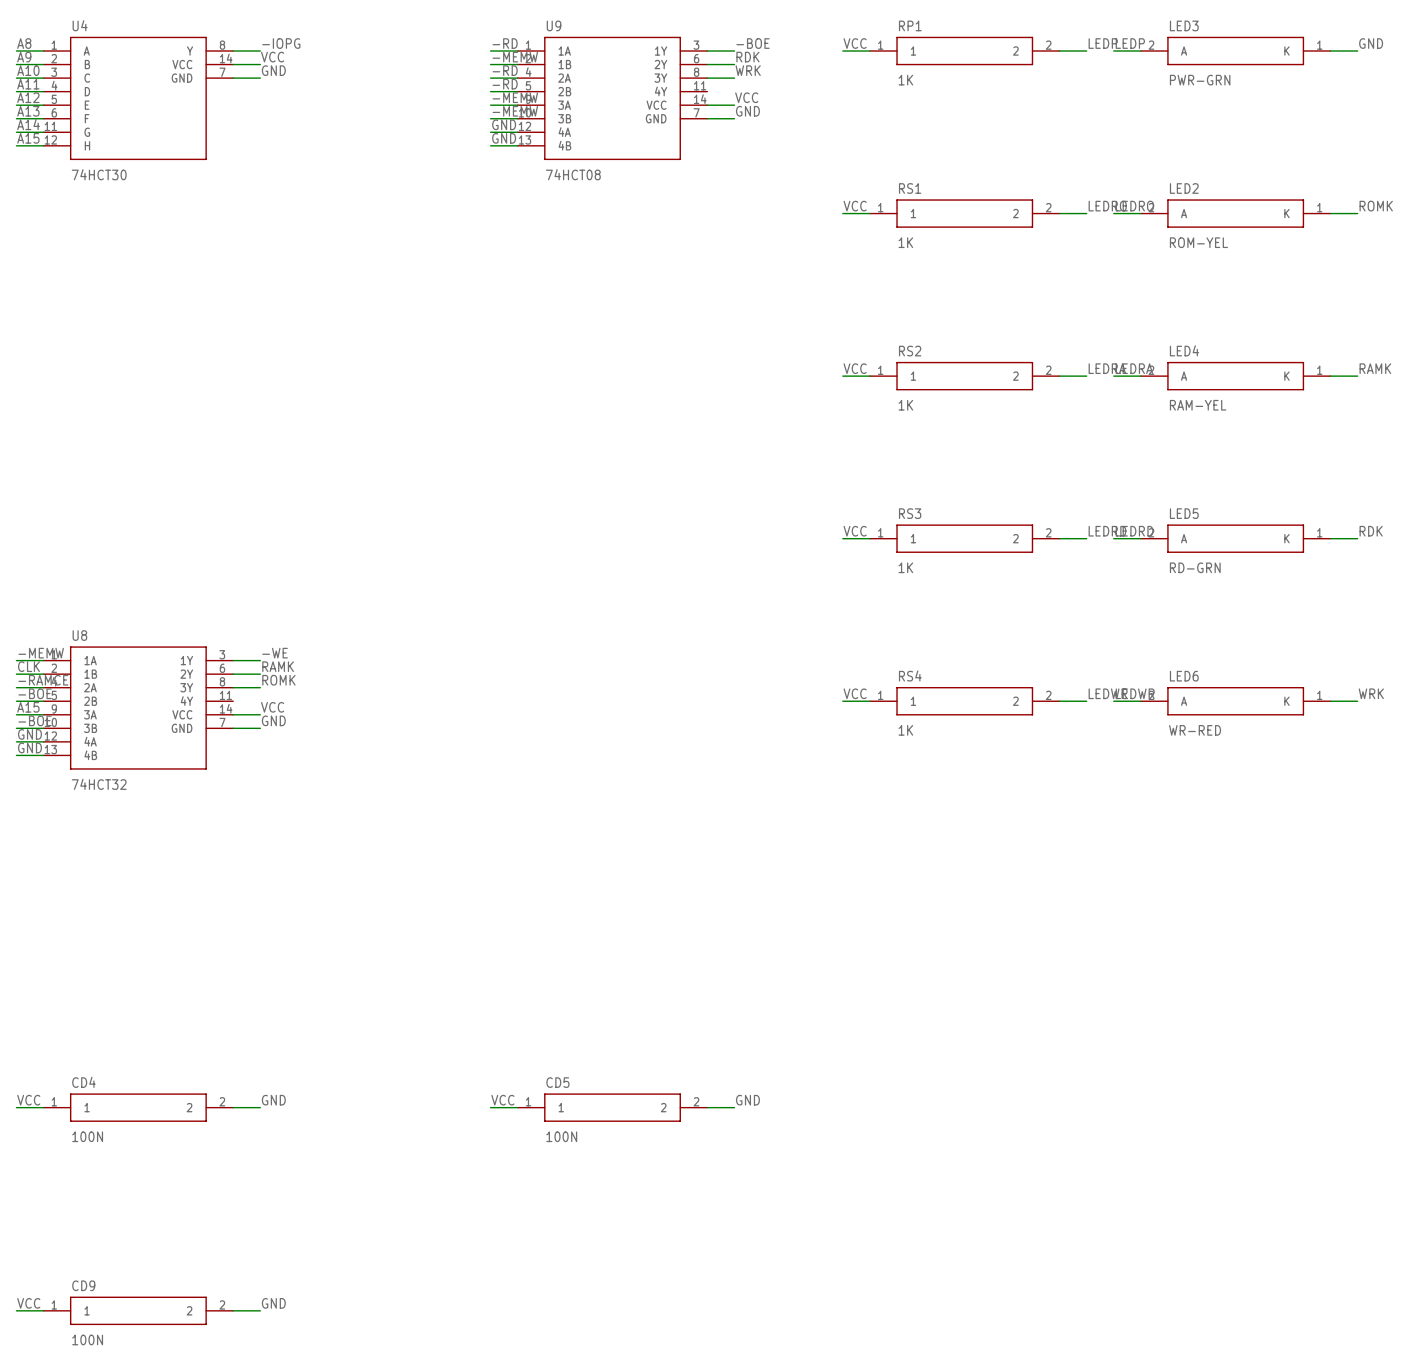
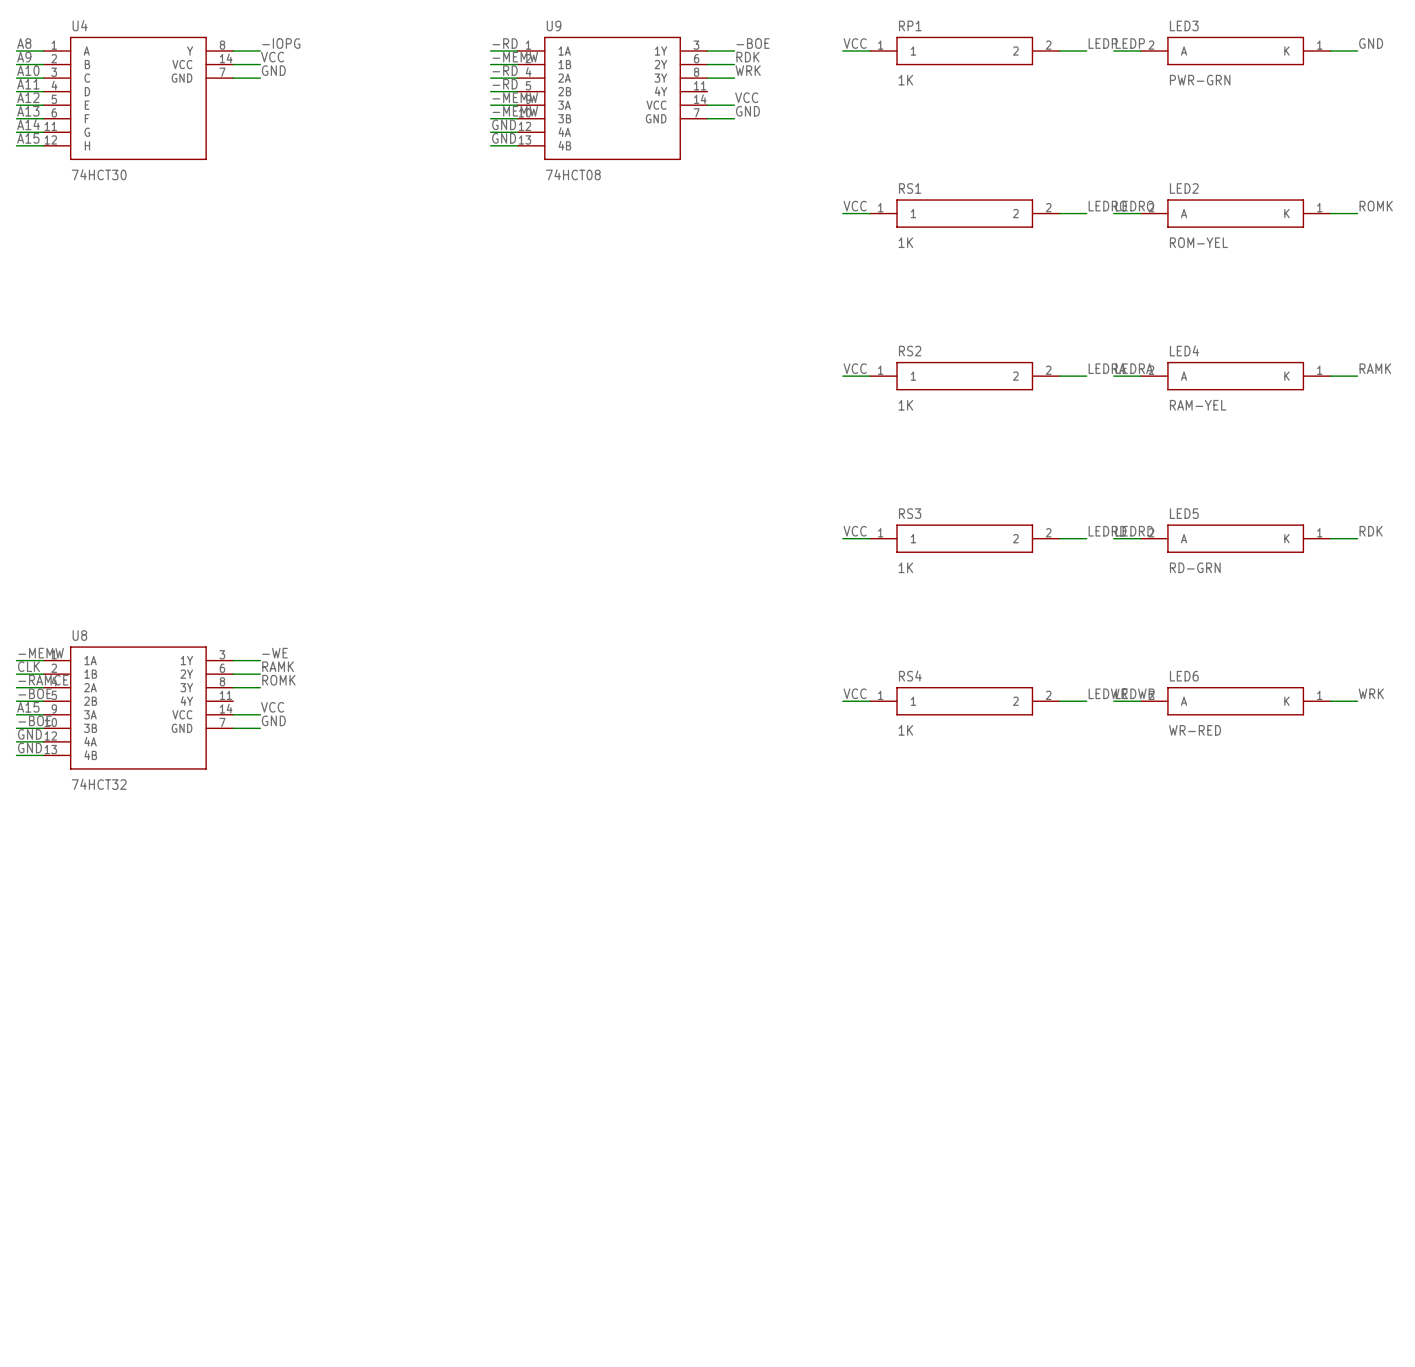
label: VCC (28, 1100) -> none
label: GND (273, 1100) -> none
label: VCC (502, 1100) -> none
label: GND (747, 1100) -> none
wire: (16, 1107) (43, 1107) -> none
CD4: 100N (138, 1107) -> none
wire: (233, 1107) (260, 1107) -> none
wire: (490, 1107) (517, 1107) -> none
CD5: 100N (612, 1107) -> none
wire: (707, 1107) (734, 1107) -> none
label: VCC (28, 1303) -> none
label: GND (273, 1303) -> none
wire: (16, 1310) (43, 1310) -> none
CD9: 100N (138, 1310) -> none
wire: (233, 1310) (260, 1310) -> none

